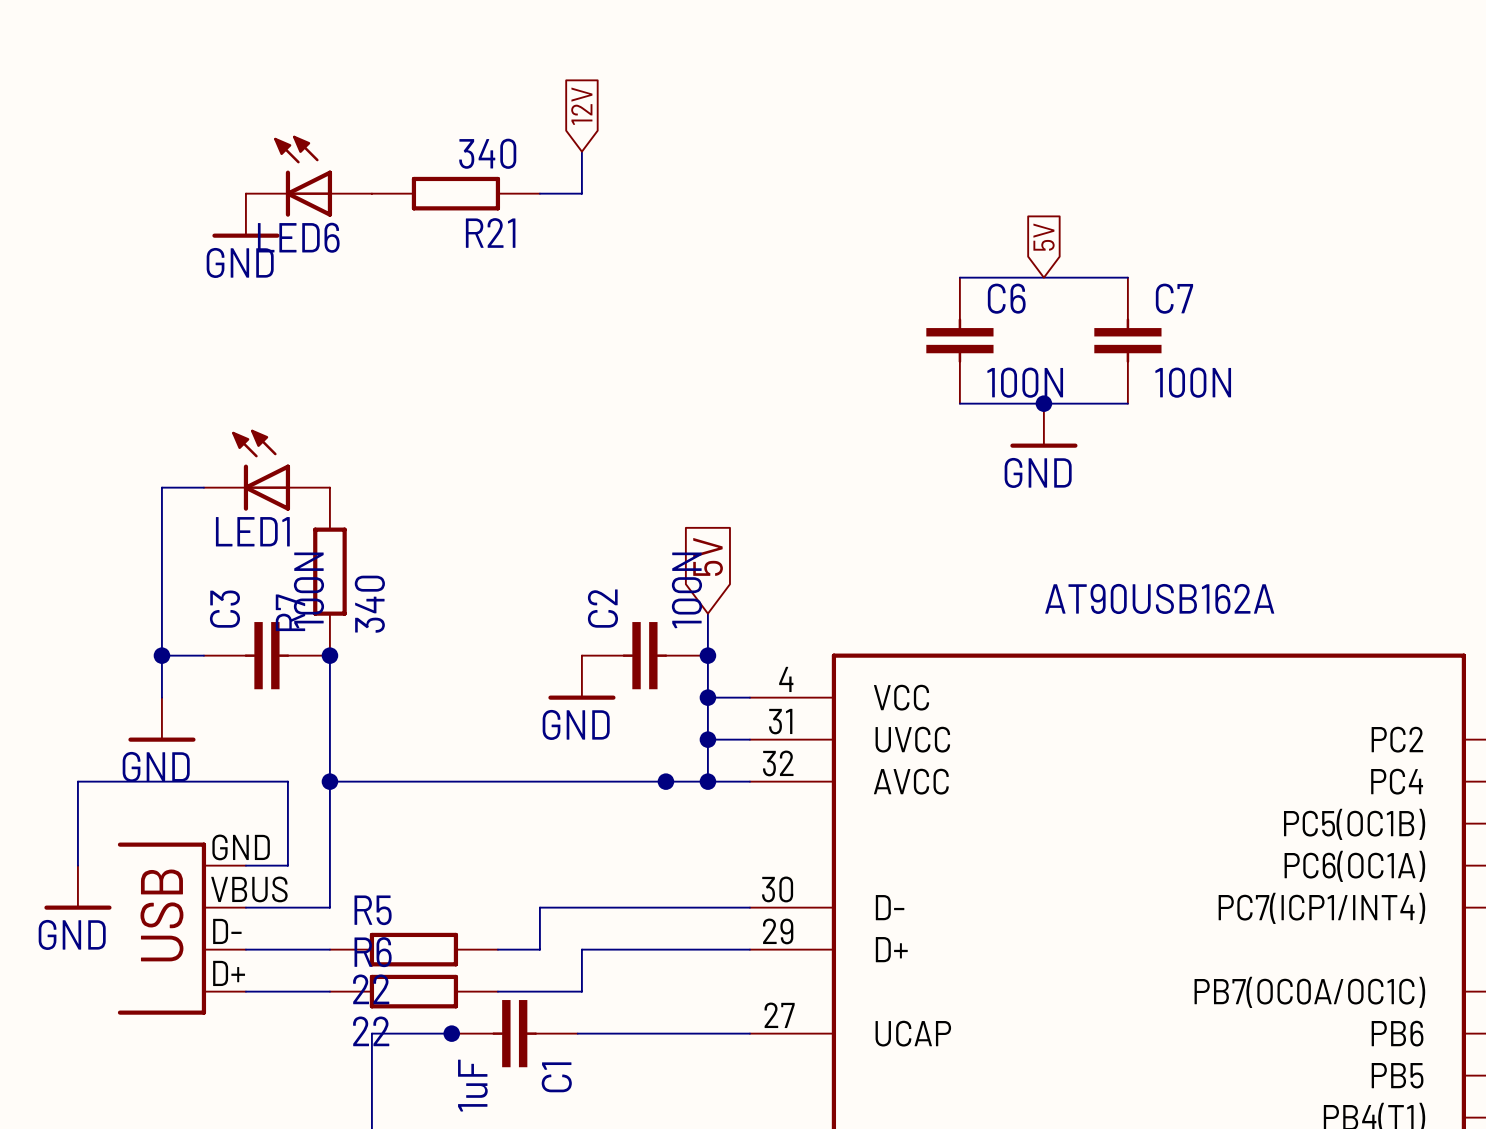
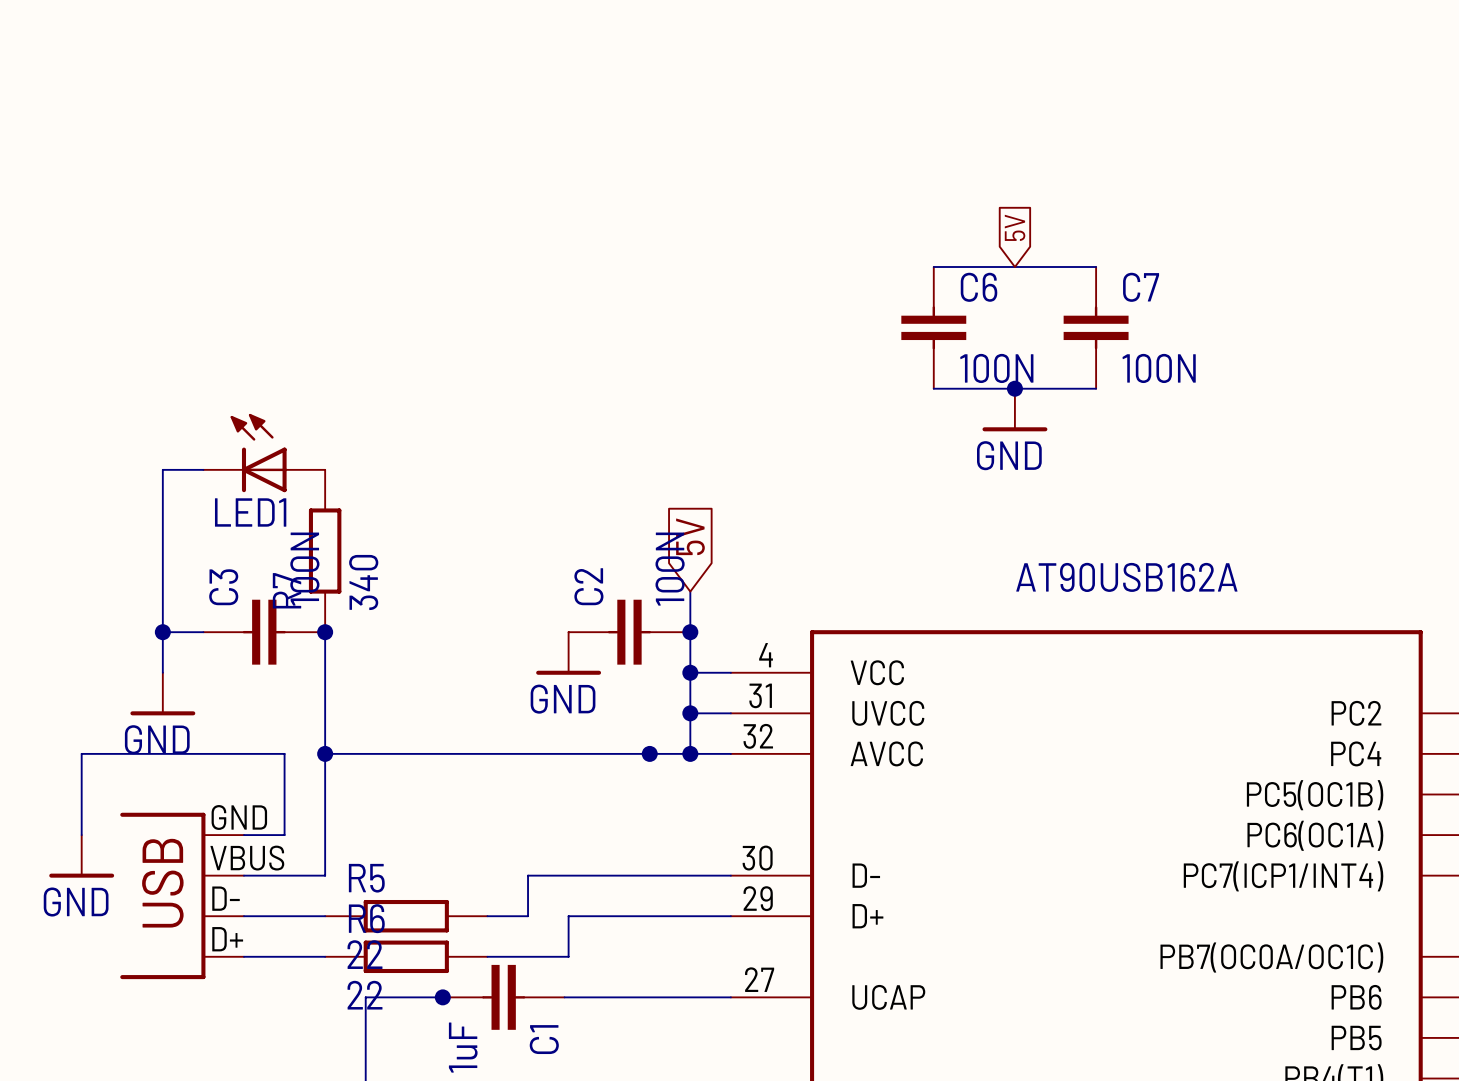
global label: 12V (581, 106) -> none
wire: (581, 151) (581, 193) (539, 193) -> none
LED6: (308, 176) -> none
R21: 340 (455, 193) -> none
power symbol: GND (245, 215) -> none

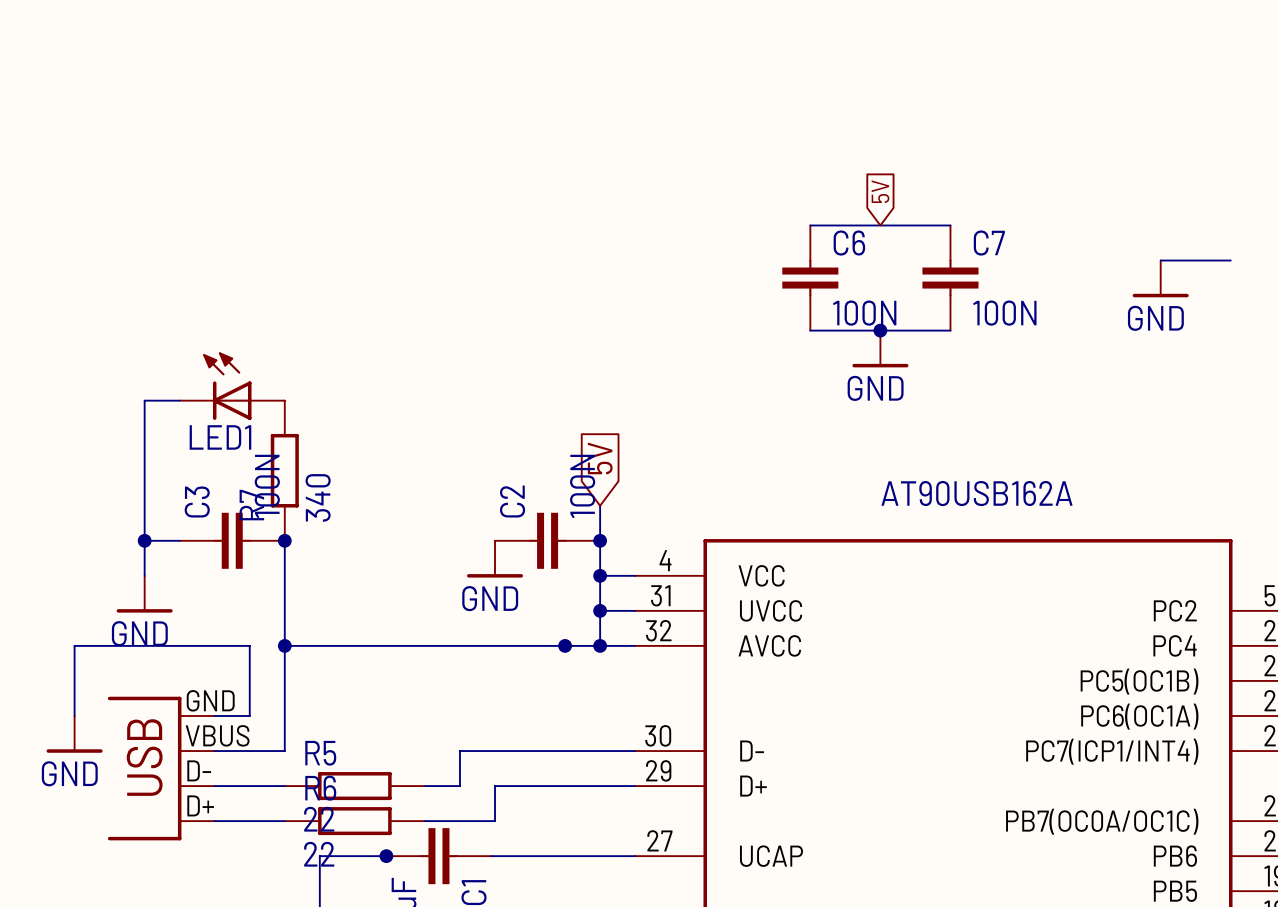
wire: none -> (1160, 260) (1230, 260)
power symbol: none -> GND (1160, 278)

